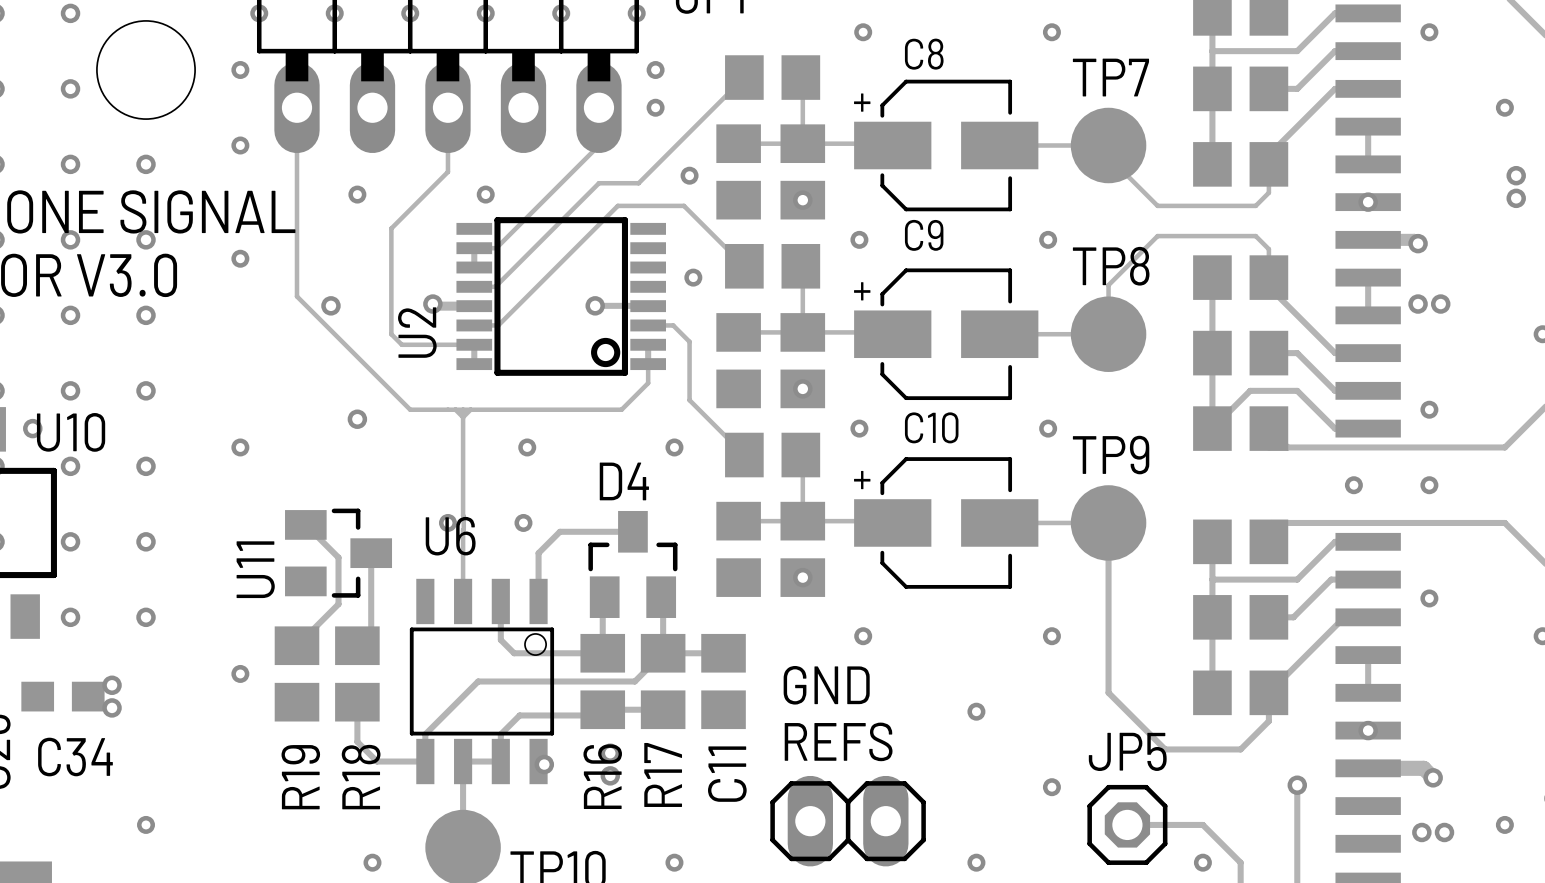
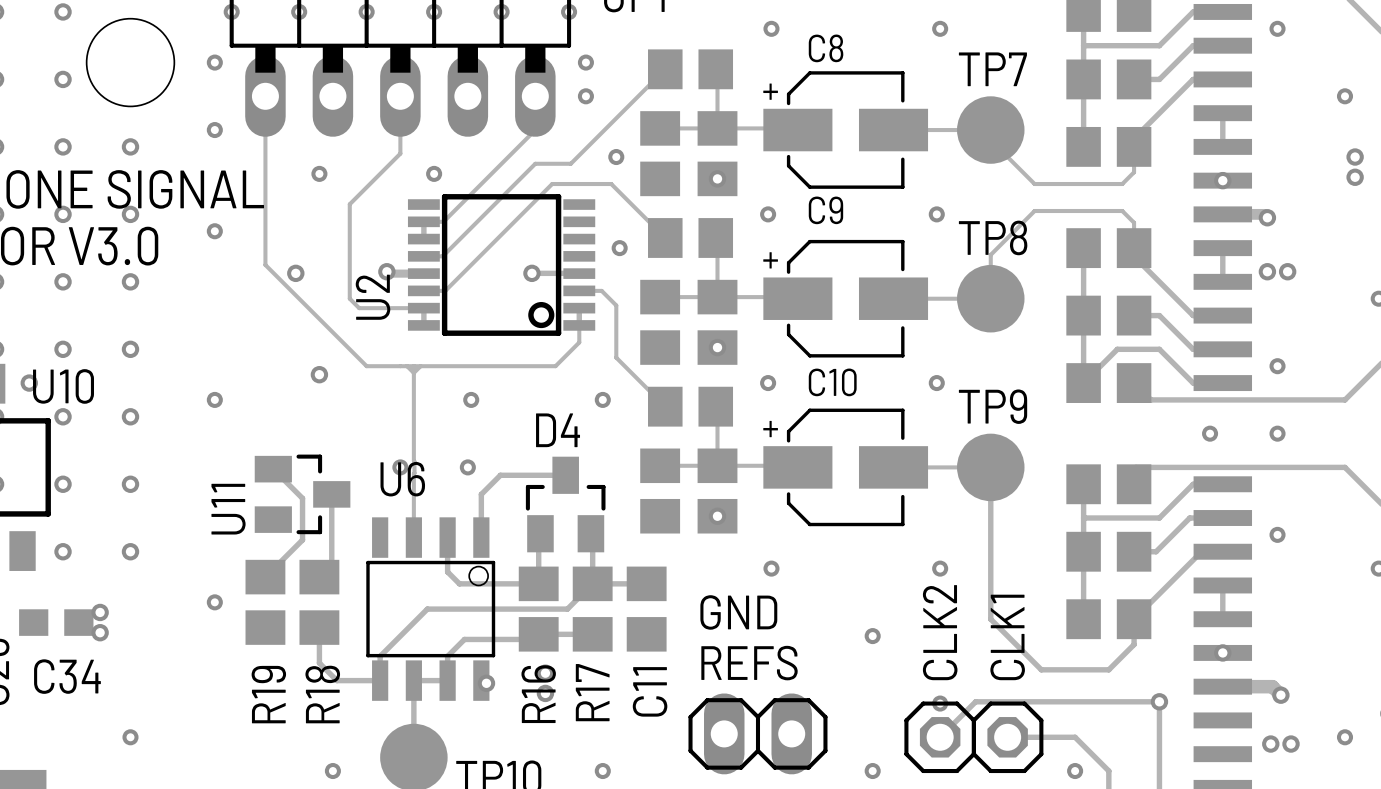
text: none -> CLK2 (940, 632)
text: none -> CLK1 (1007, 637)
JP5 name: JP5 (1127, 751) -> none
track: none -> (1159, 701) (975, 701) (940, 737)
part: none -> (940, 737)

